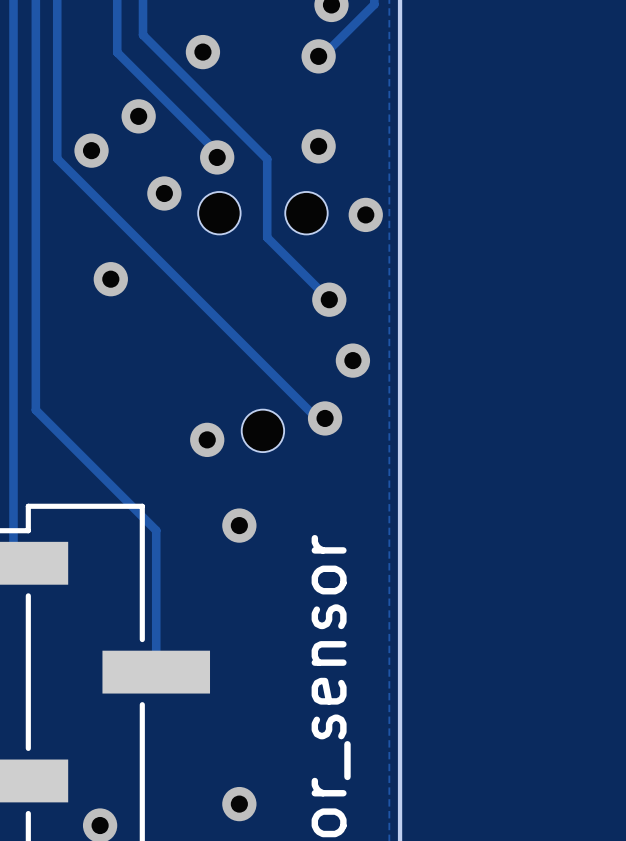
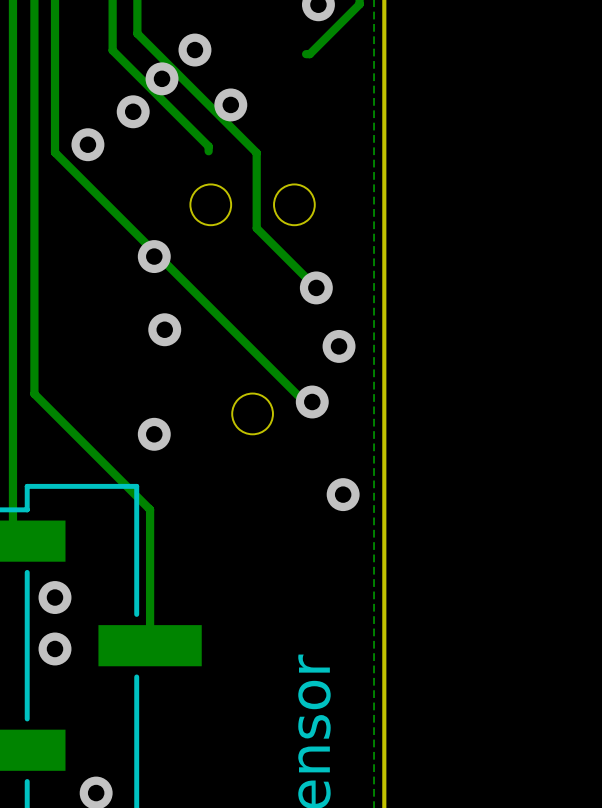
via: (318, 56) -> none
via: none -> (162, 78)
via: none -> (230, 104)
via: (318, 146) -> none
via: (217, 157) -> none
via: (164, 193) -> none
via: (365, 214) -> none
via: none -> (154, 256)
via: (110, 279) -> none
via: none -> (164, 329)
via position: (207, 439) -> (154, 434)
via: none -> (343, 494)
via: (239, 525) -> none
via: none -> (55, 597)
via: none -> (55, 648)
via: (239, 804) -> none

